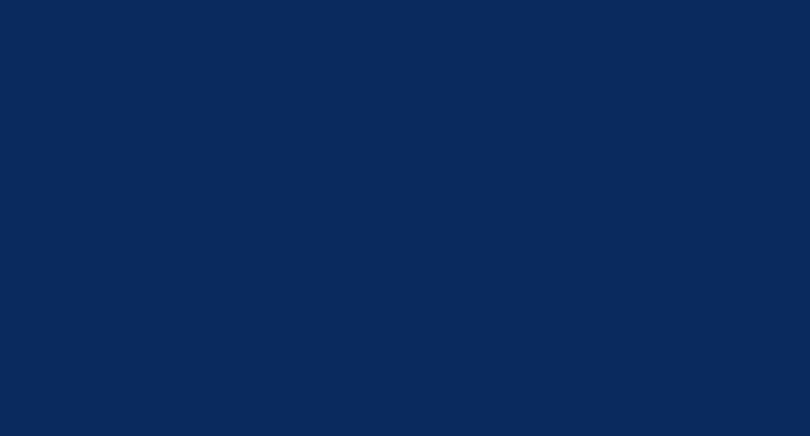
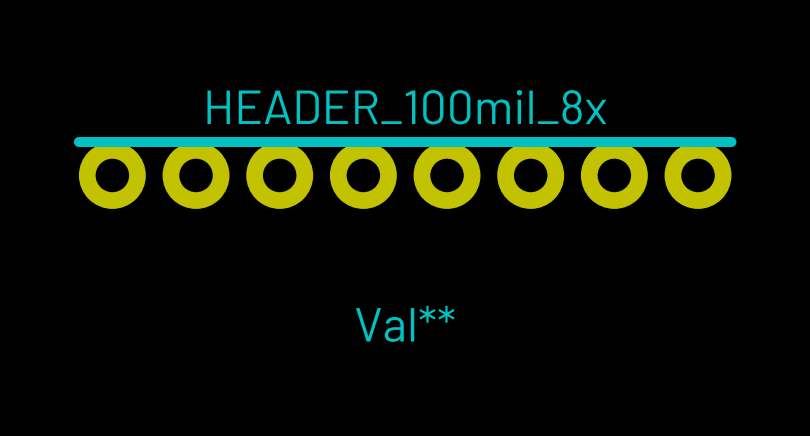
HEADER_100mil_8x: none -> Val** (405, 172)

